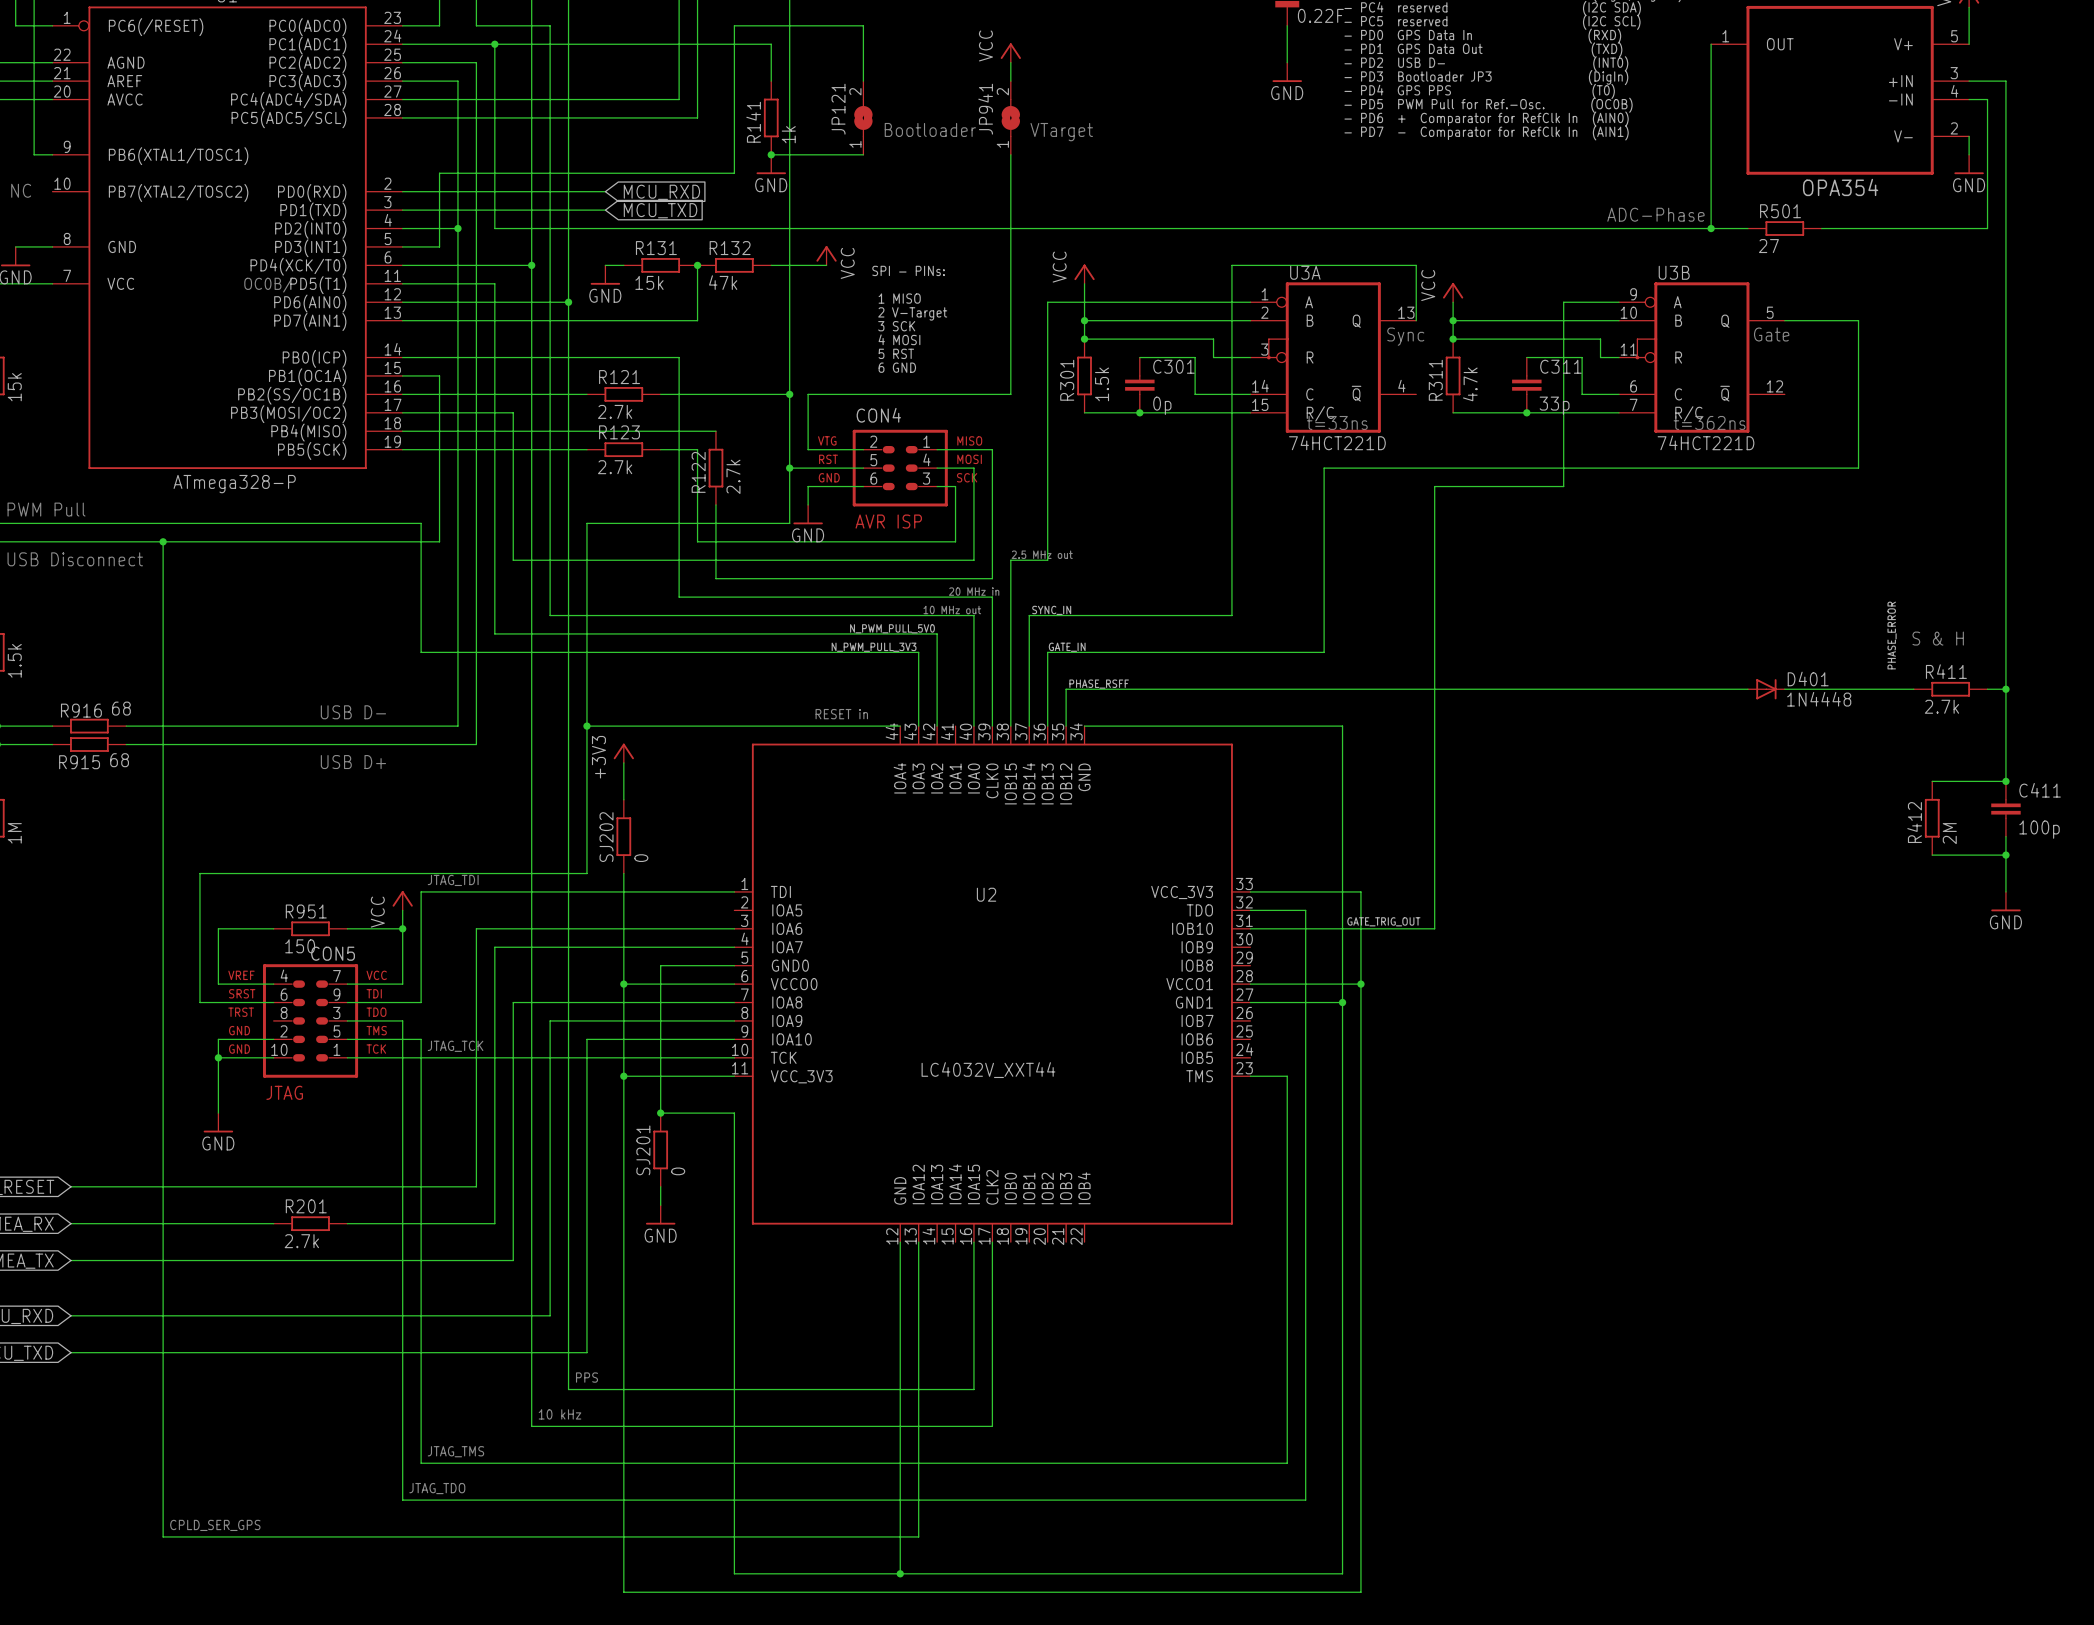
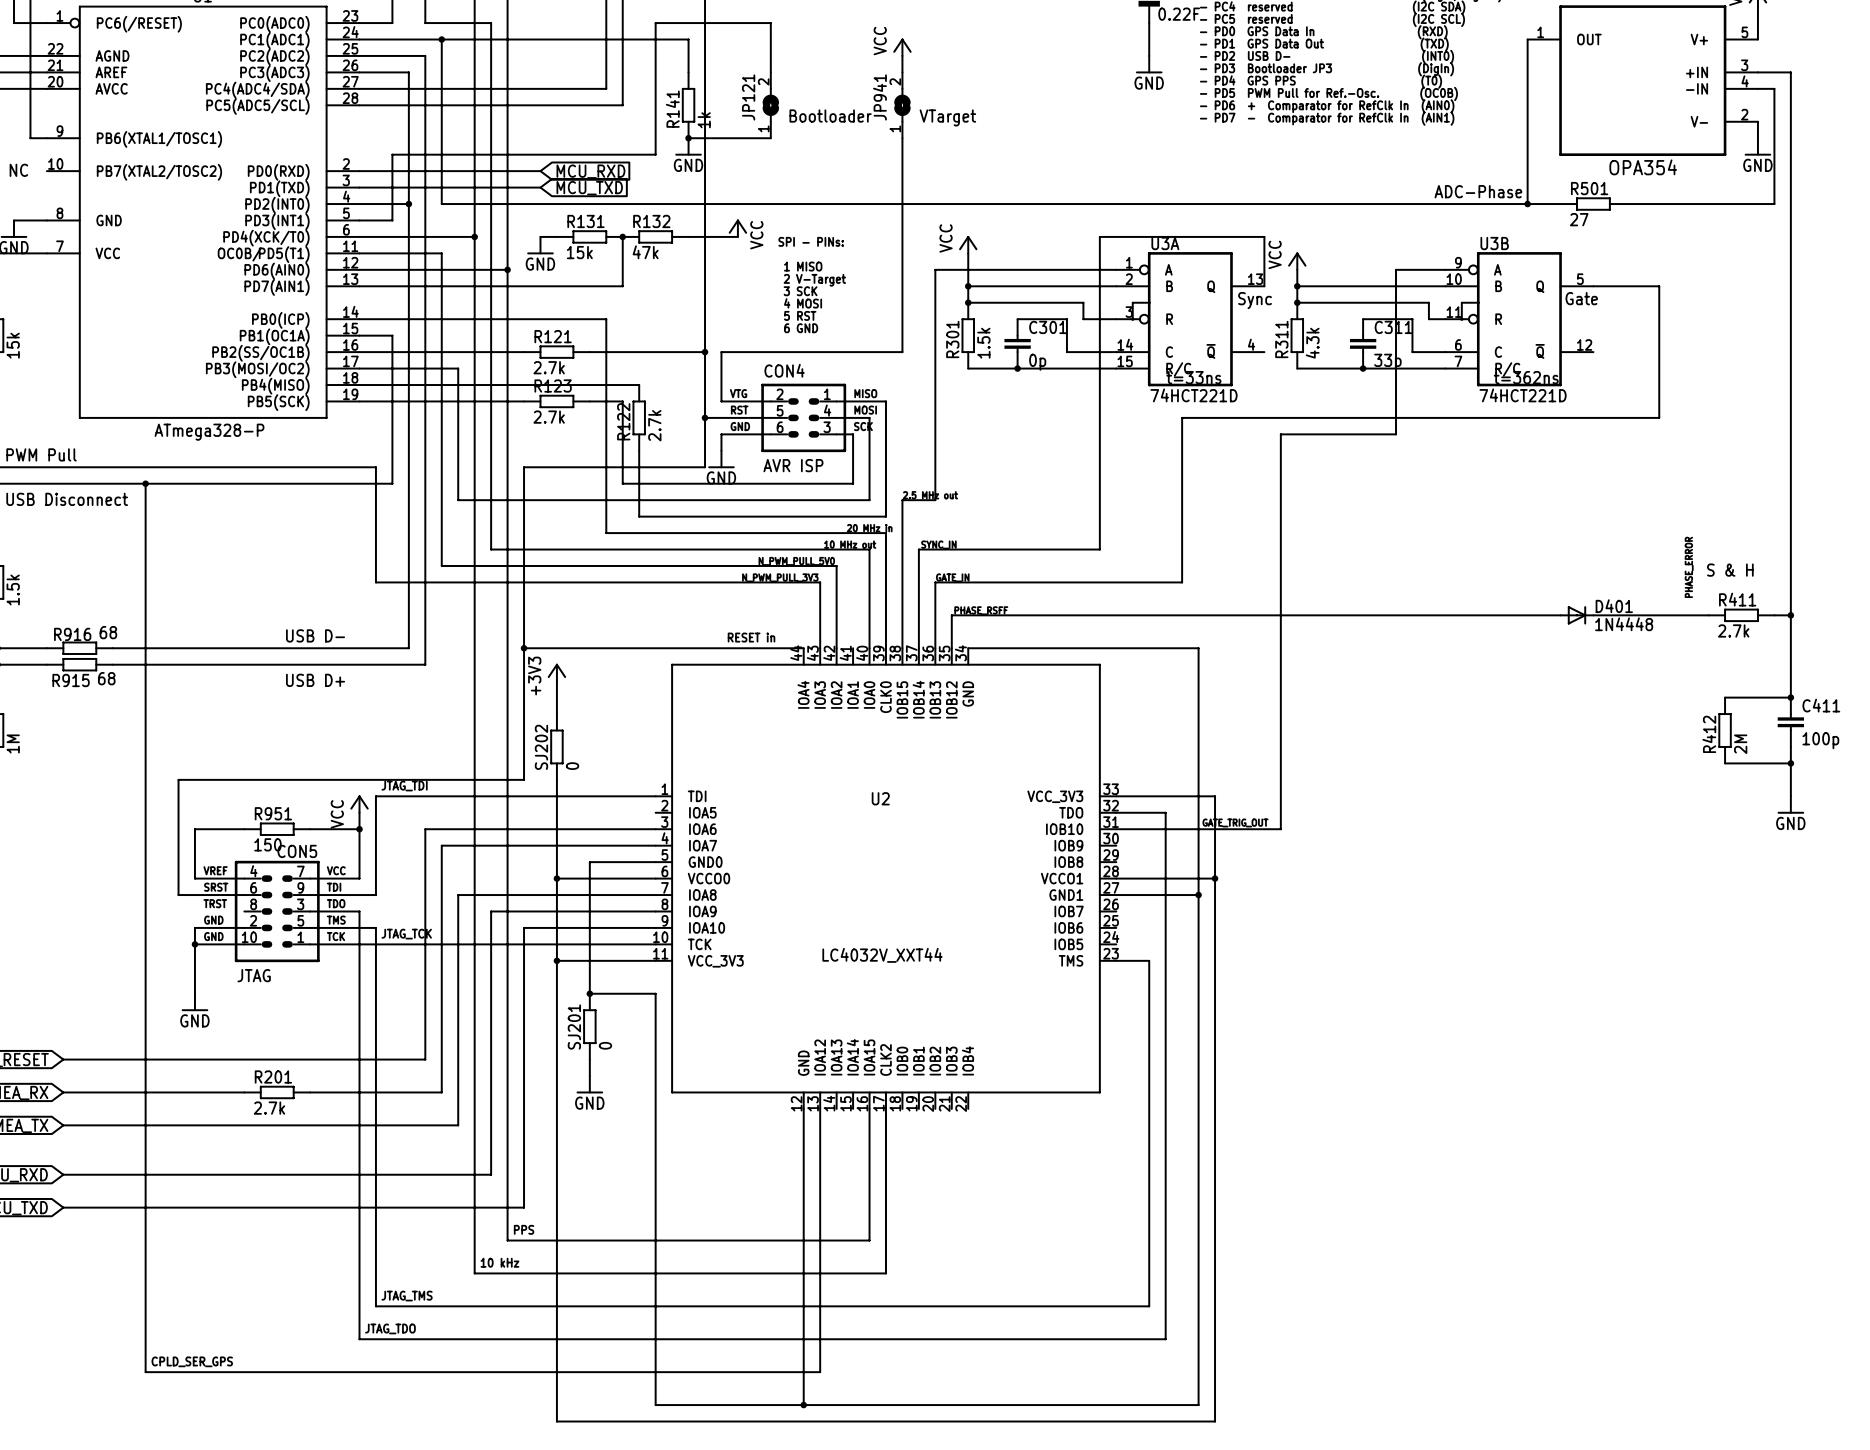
R311 value: 4.7k (1470, 384) -> 4.3k (1312, 343)

